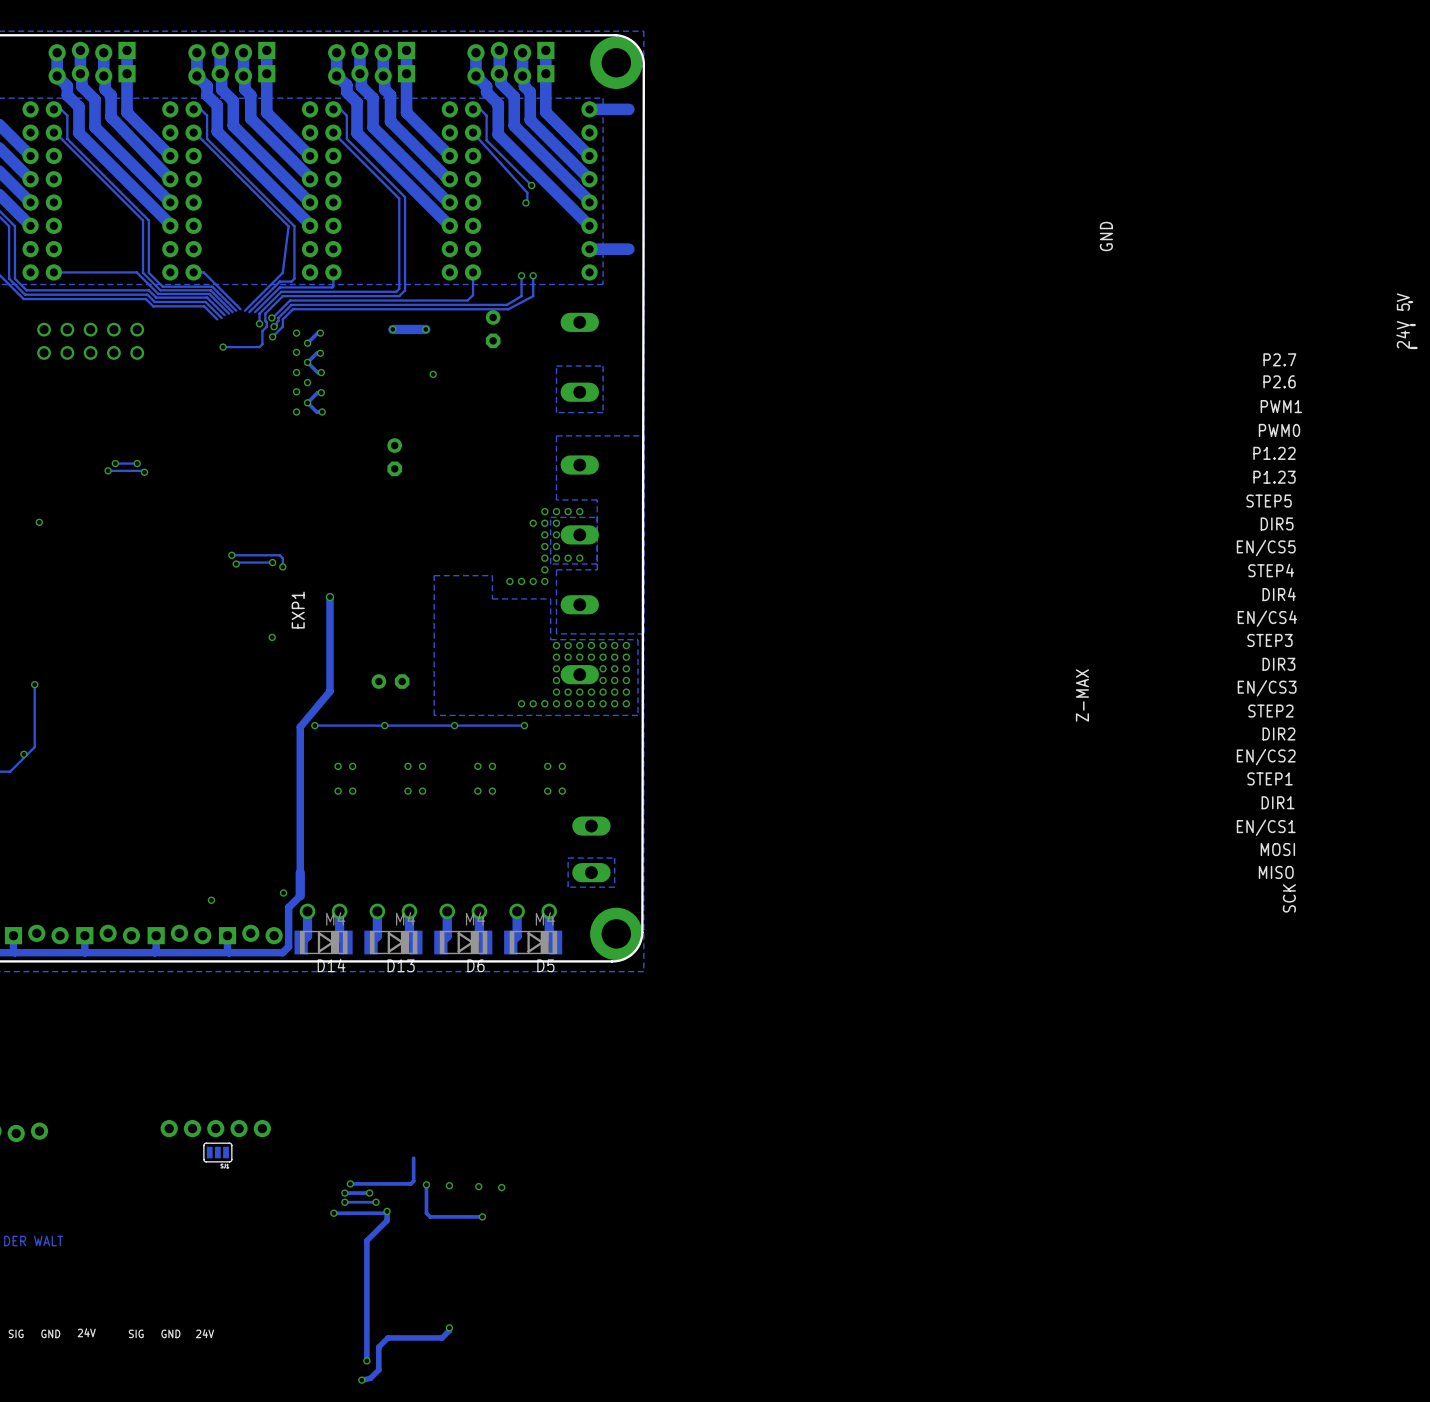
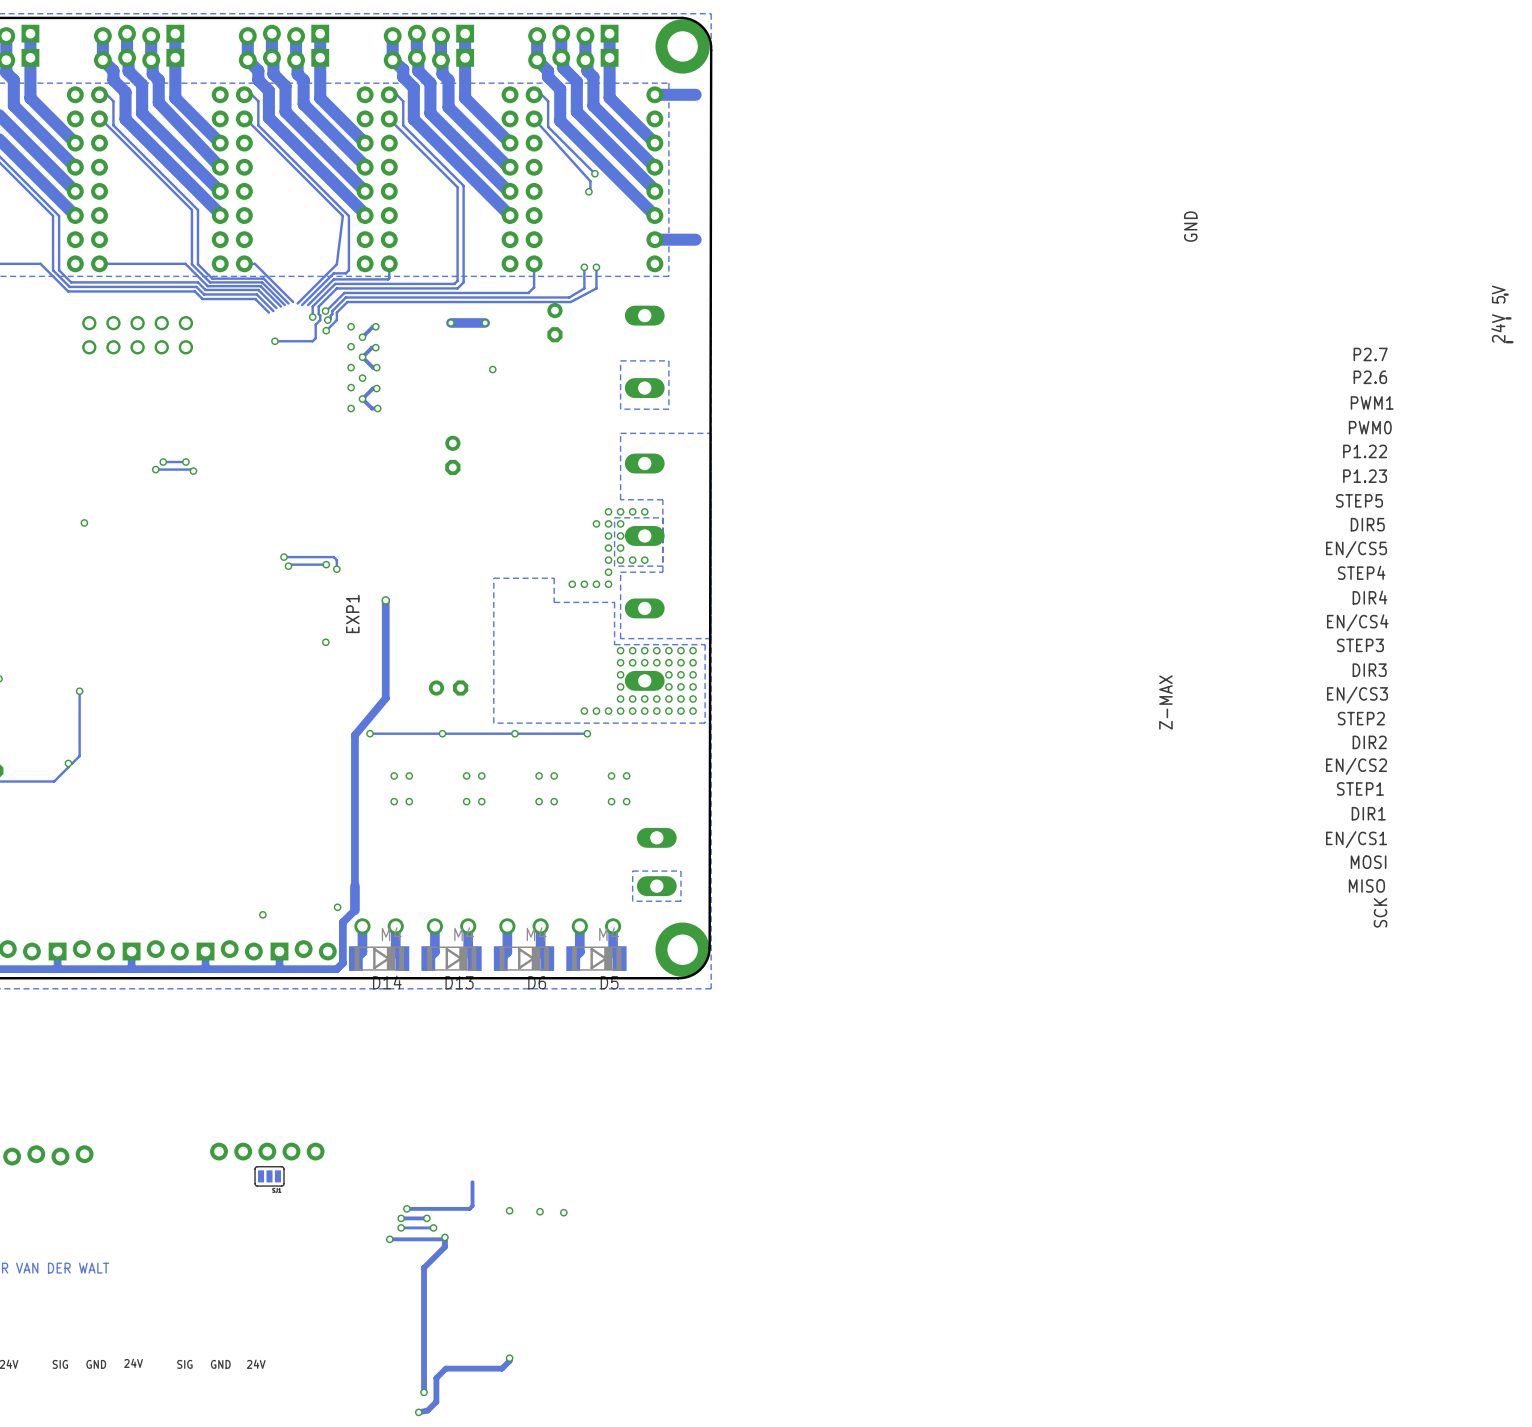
track: (426, 1184) (426, 1213) (430, 1216) (482, 1216) -> none
via: (426, 1184) -> none
via: (482, 1216) -> none

